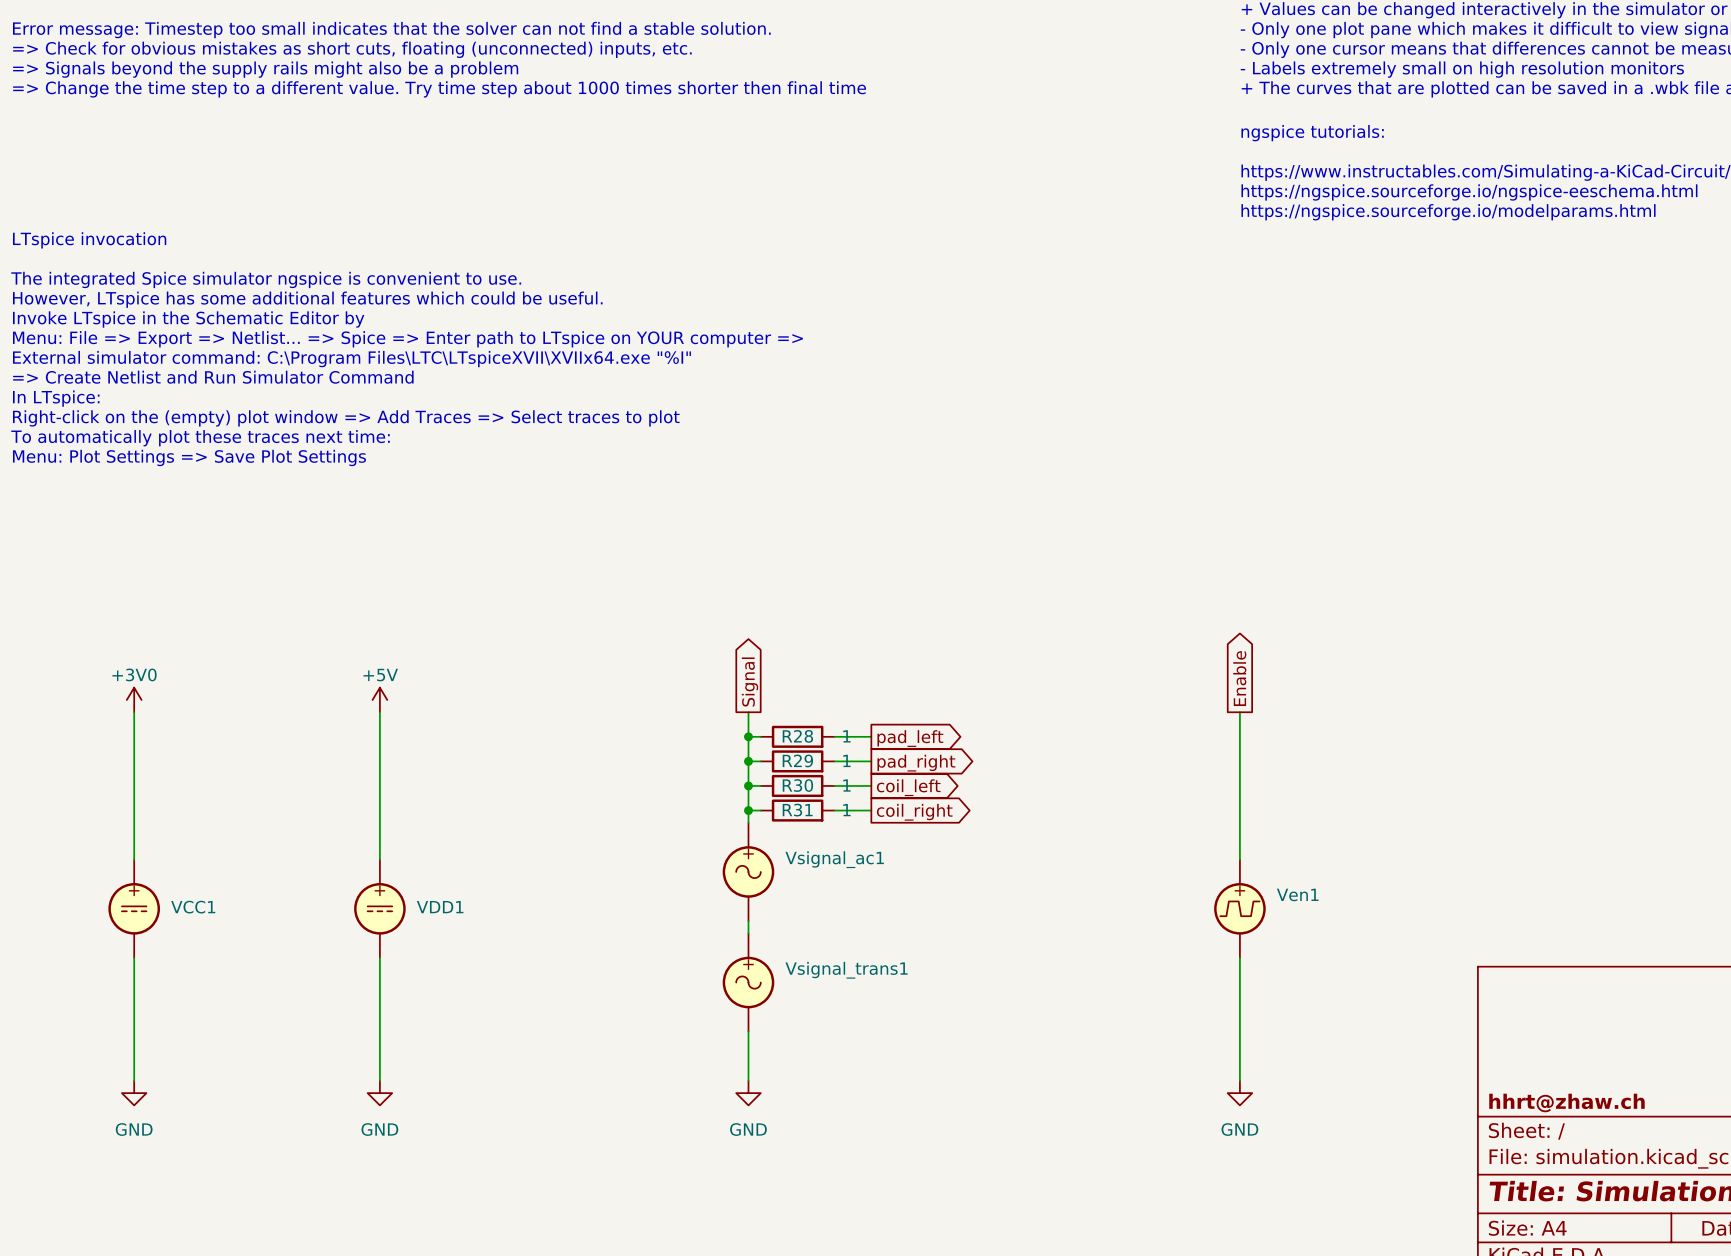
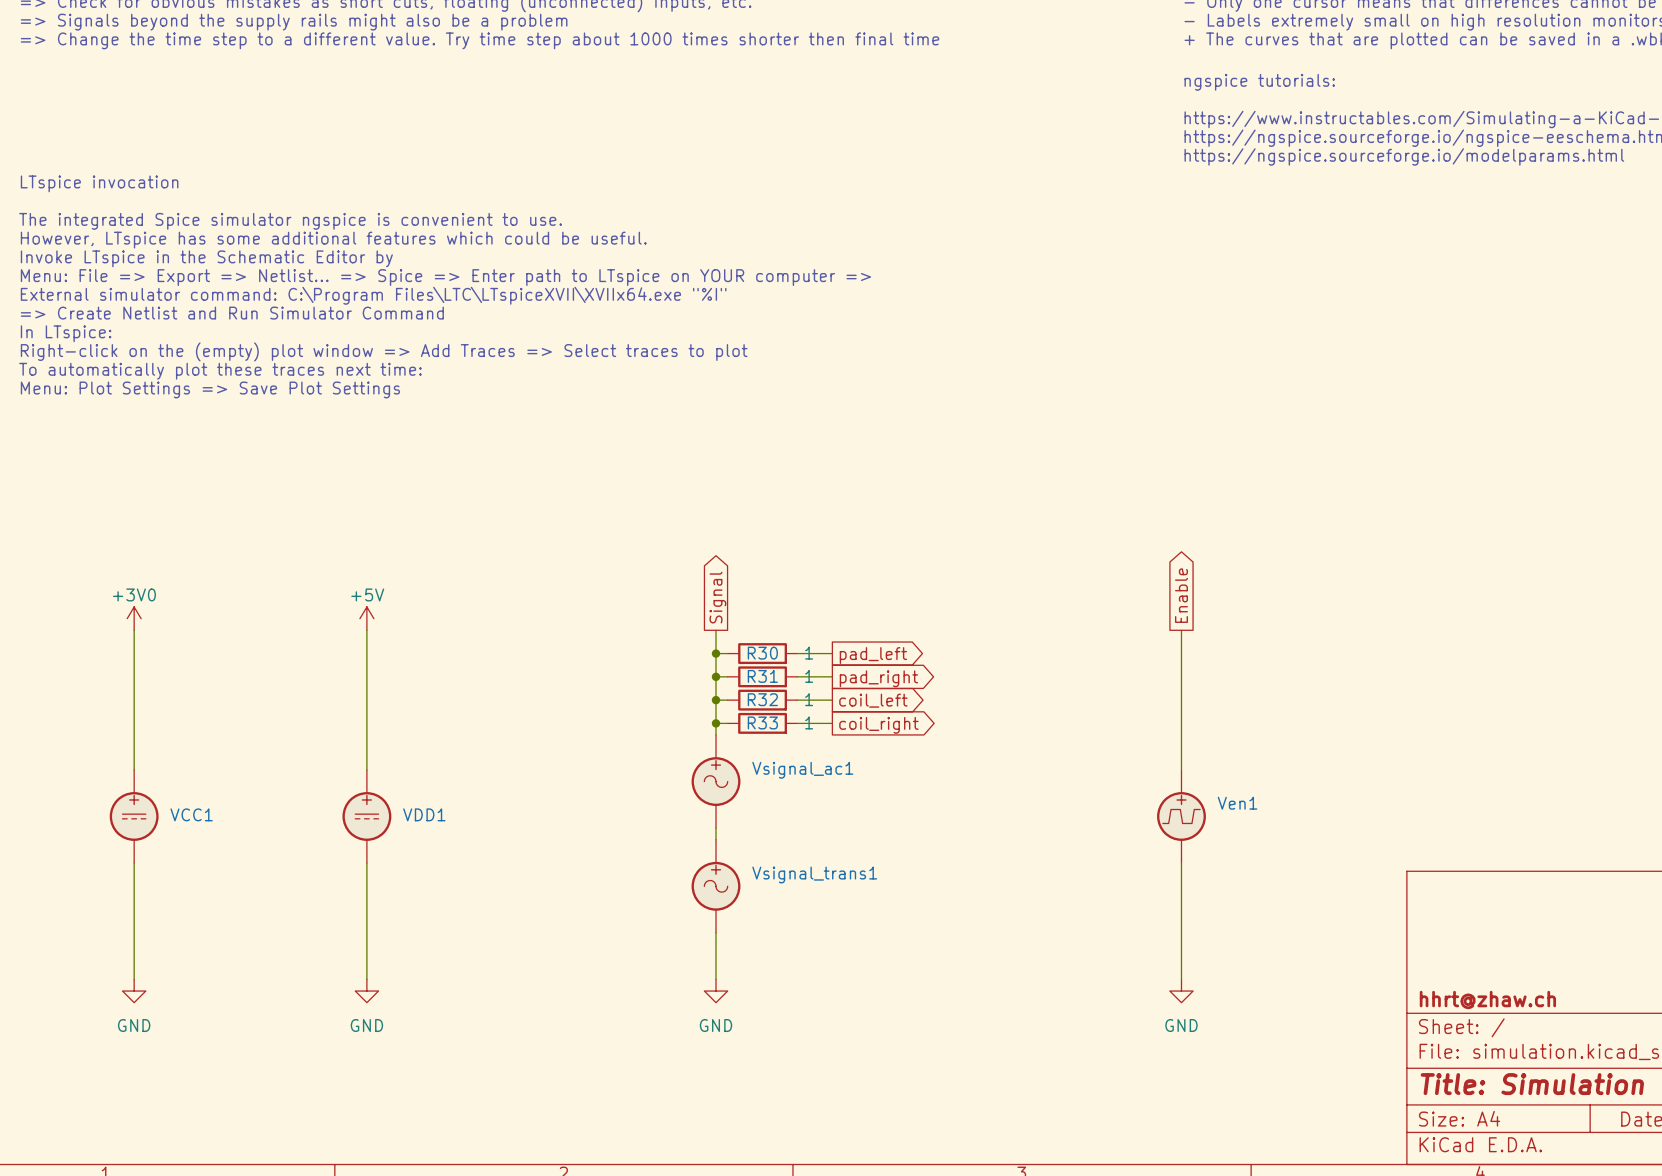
R28 name: R28 (797, 736) -> R30 (762, 653)
R29 name: R29 (797, 760) -> R31 (762, 676)
R30 name: R30 (797, 785) -> R32 (762, 699)
R31 name: R31 (797, 810) -> R33 (762, 722)

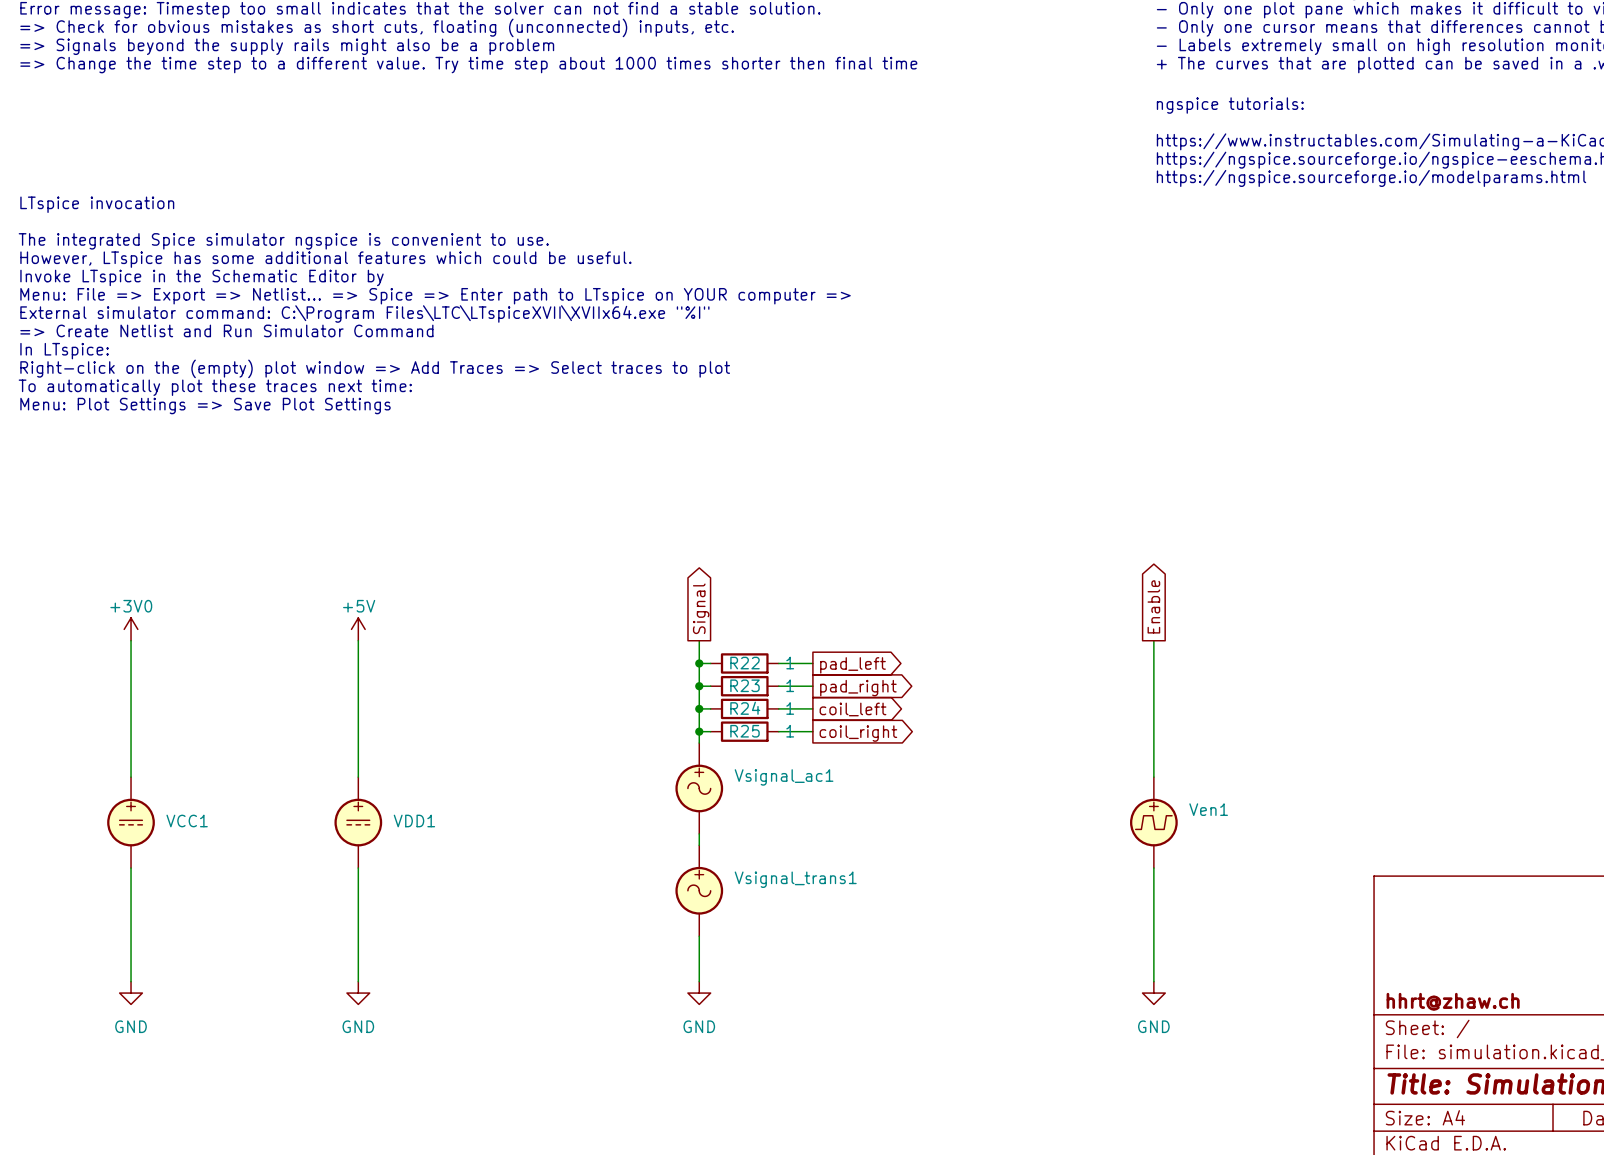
R30 name: R30 (762, 653) -> R22 (745, 663)
R31 name: R31 (762, 676) -> R23 (745, 685)
R32 name: R32 (762, 699) -> R24 (745, 708)
R33 name: R33 (762, 722) -> R25 (745, 731)

